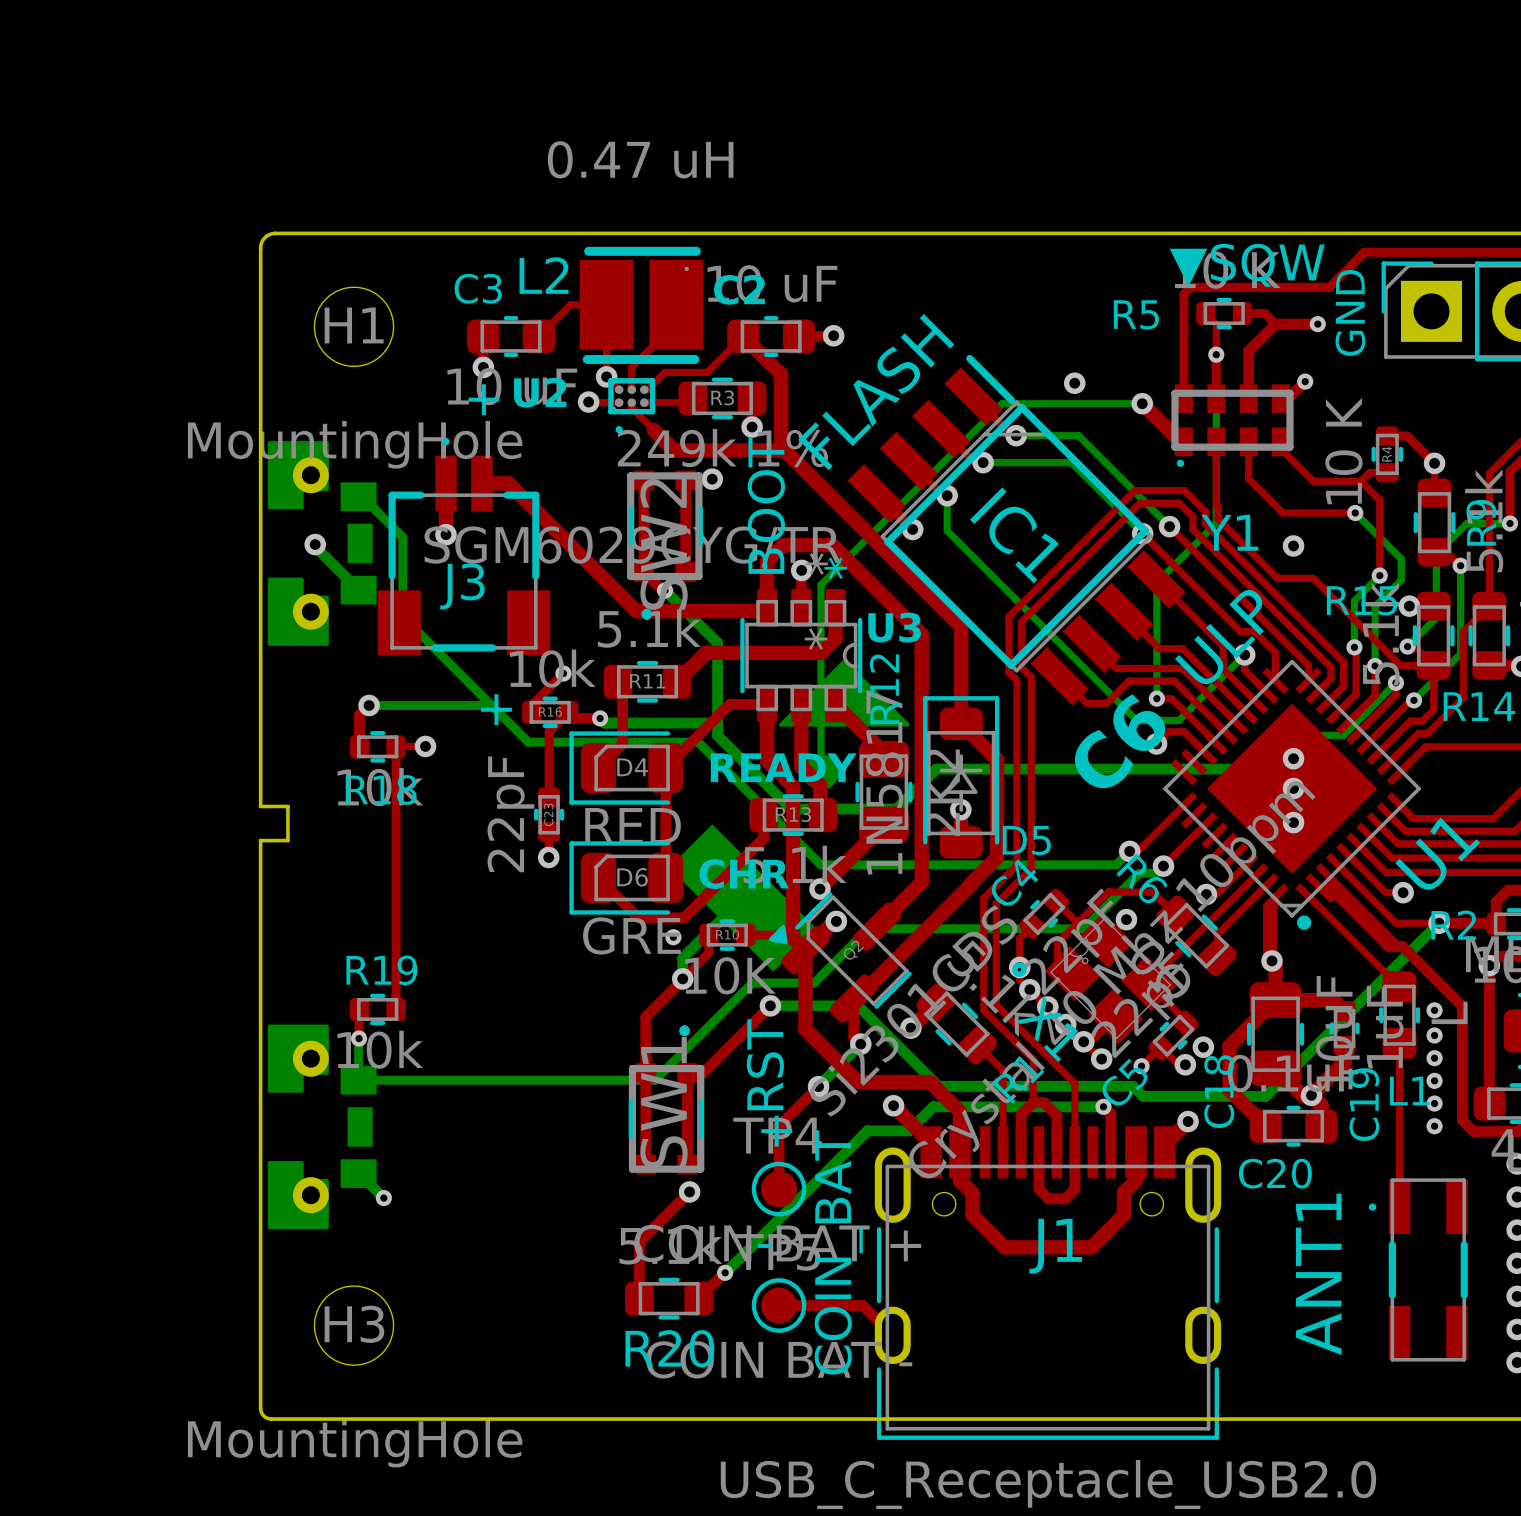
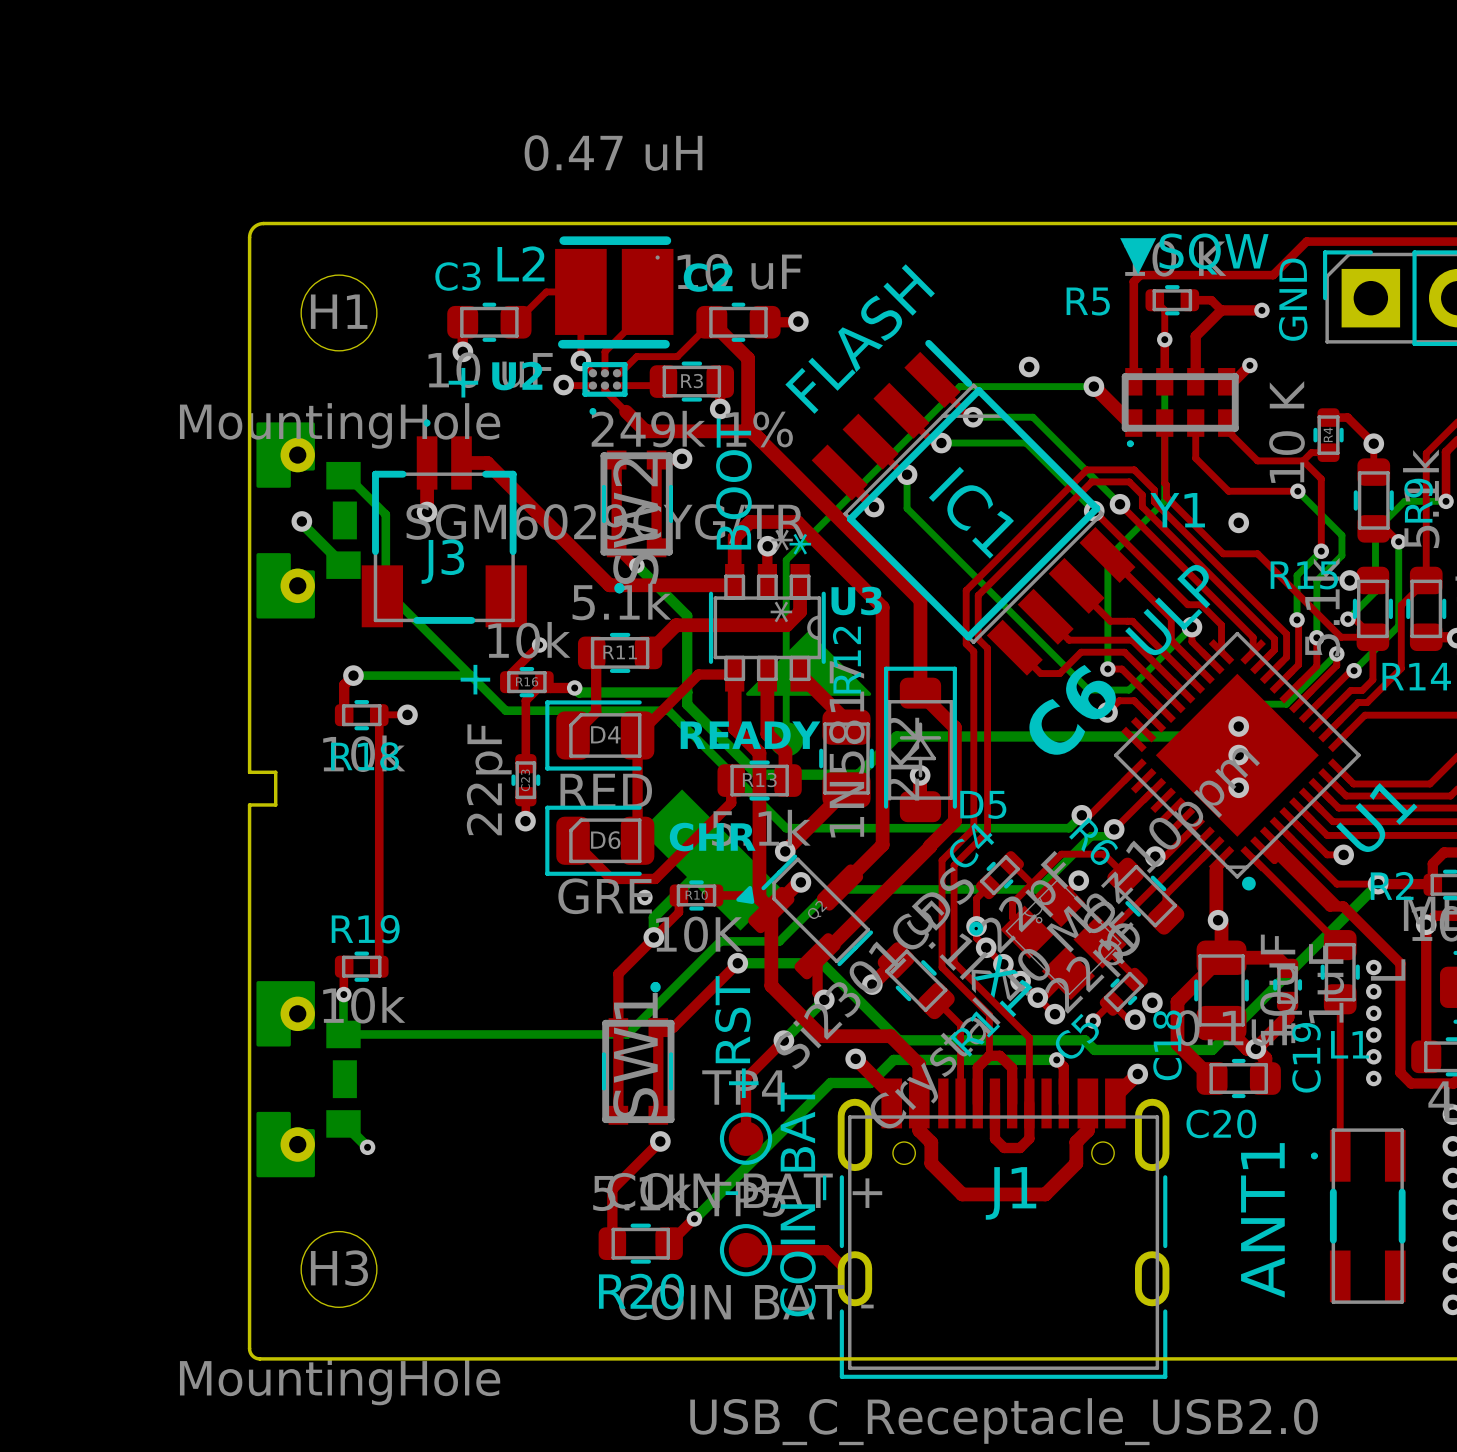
text position: FLASH (876, 392) -> FLASH (860, 339)

